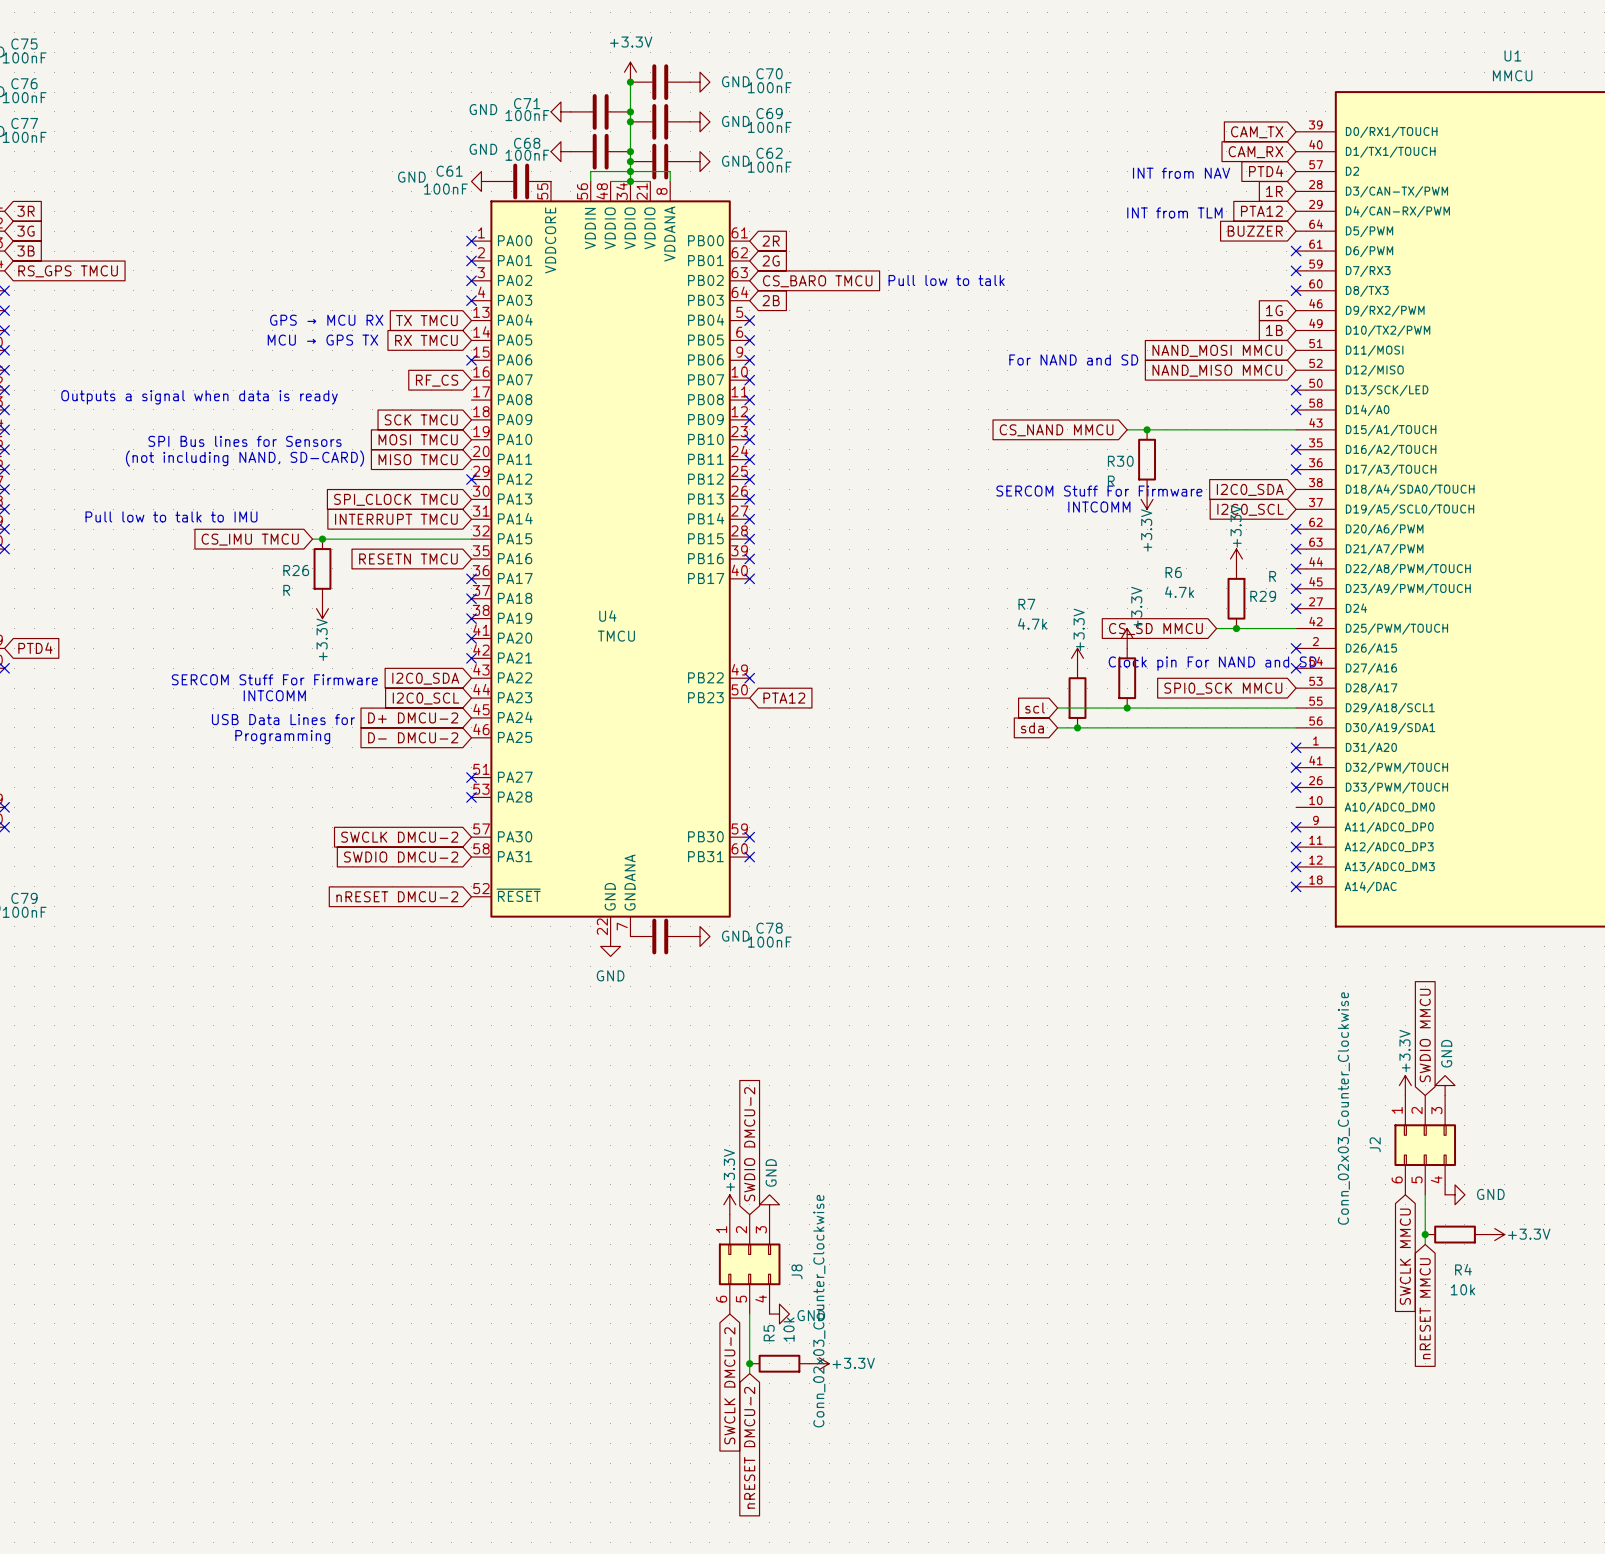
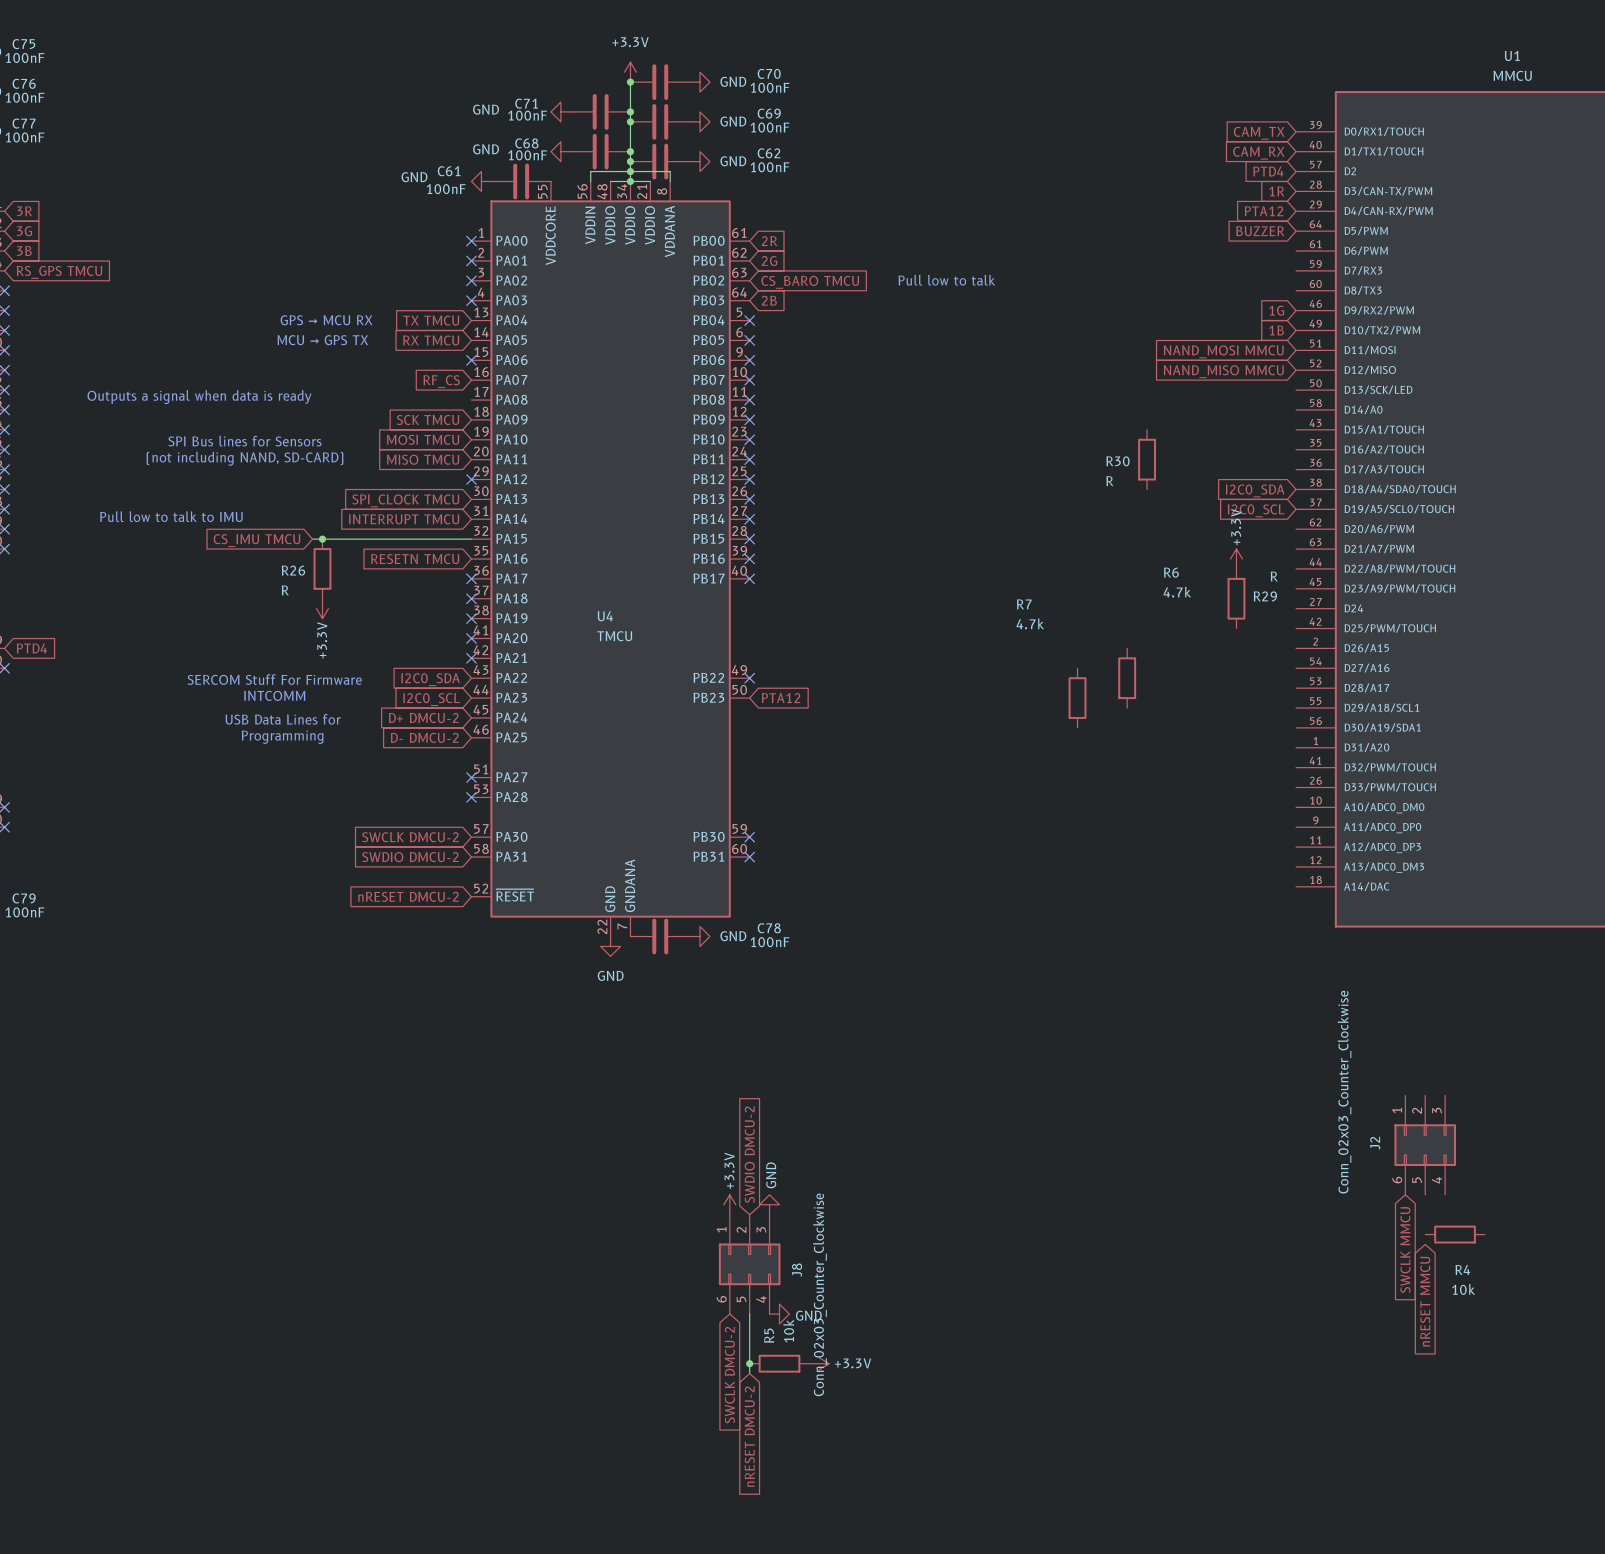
text: INT from NAV (1181, 173) -> none
text: INT from TLM (1174, 212) -> none
no-connect mark: (1296, 251) -> none
no-connect mark: (1296, 270) -> none
no-connect mark: (1296, 290) -> none
text: For NAND and SD (1073, 359) -> none
no-connect mark: (1296, 390) -> none
no-connect mark: (1296, 409) -> none
wire: (1127, 429) (1296, 429) -> none
junction: (1147, 429) -> none
global label: CS_NAND MMCU (1056, 430) -> none
no-connect mark: (1296, 449) -> none
no-connect mark: (1296, 469) -> none
text: SERCOM Stuff For Firmware (1099, 491) -> none
power symbol: +3.3V (1147, 499) -> none
text: INTCOMM (1099, 507) -> none
no-connect mark: (1296, 529) -> none
no-connect mark: (1296, 549) -> none
no-connect mark: (1296, 568) -> none
no-connect mark: (1296, 588) -> none
no-connect mark: (1296, 608) -> none
wire: (1216, 628) (1296, 628) -> none
junction: (1236, 628) -> none
global label: CS_SD MMCU (1155, 629) -> none
power symbol: +3.3V (1127, 638) -> none
no-connect mark: (1296, 648) -> none
power symbol: +3.3V (1077, 658) -> none
text: Clock pin For NAND and SD (1212, 663) -> none
no-connect mark: (1296, 668) -> none
global label: SPI0_SCK MMCU (1223, 688) -> none
global label: scl (1035, 708) -> none
wire: (1057, 708) (1296, 708) -> none
junction: (1127, 708) -> none
global label: sda (1032, 727) -> none
wire: (1057, 727) (1296, 727) -> none
junction: (1077, 727) -> none
no-connect mark: (1296, 747) -> none
no-connect mark: (1296, 767) -> none
no-connect mark: (1296, 787) -> none
no-connect mark: (1296, 827) -> none
no-connect mark: (1296, 847) -> none
no-connect mark: (1296, 866) -> none
no-connect mark: (1296, 886) -> none
global label: SWDIO MMCU (1425, 1035) -> none
power symbol: +3.3V (1405, 1085) -> none
power symbol: GND (1445, 1085) -> none
wire: (1425, 1194) (1425, 1244) -> none
power symbol: GND (1455, 1194) -> none
junction: (1425, 1234) -> none
power symbol: +3.3V (1494, 1234) -> none

